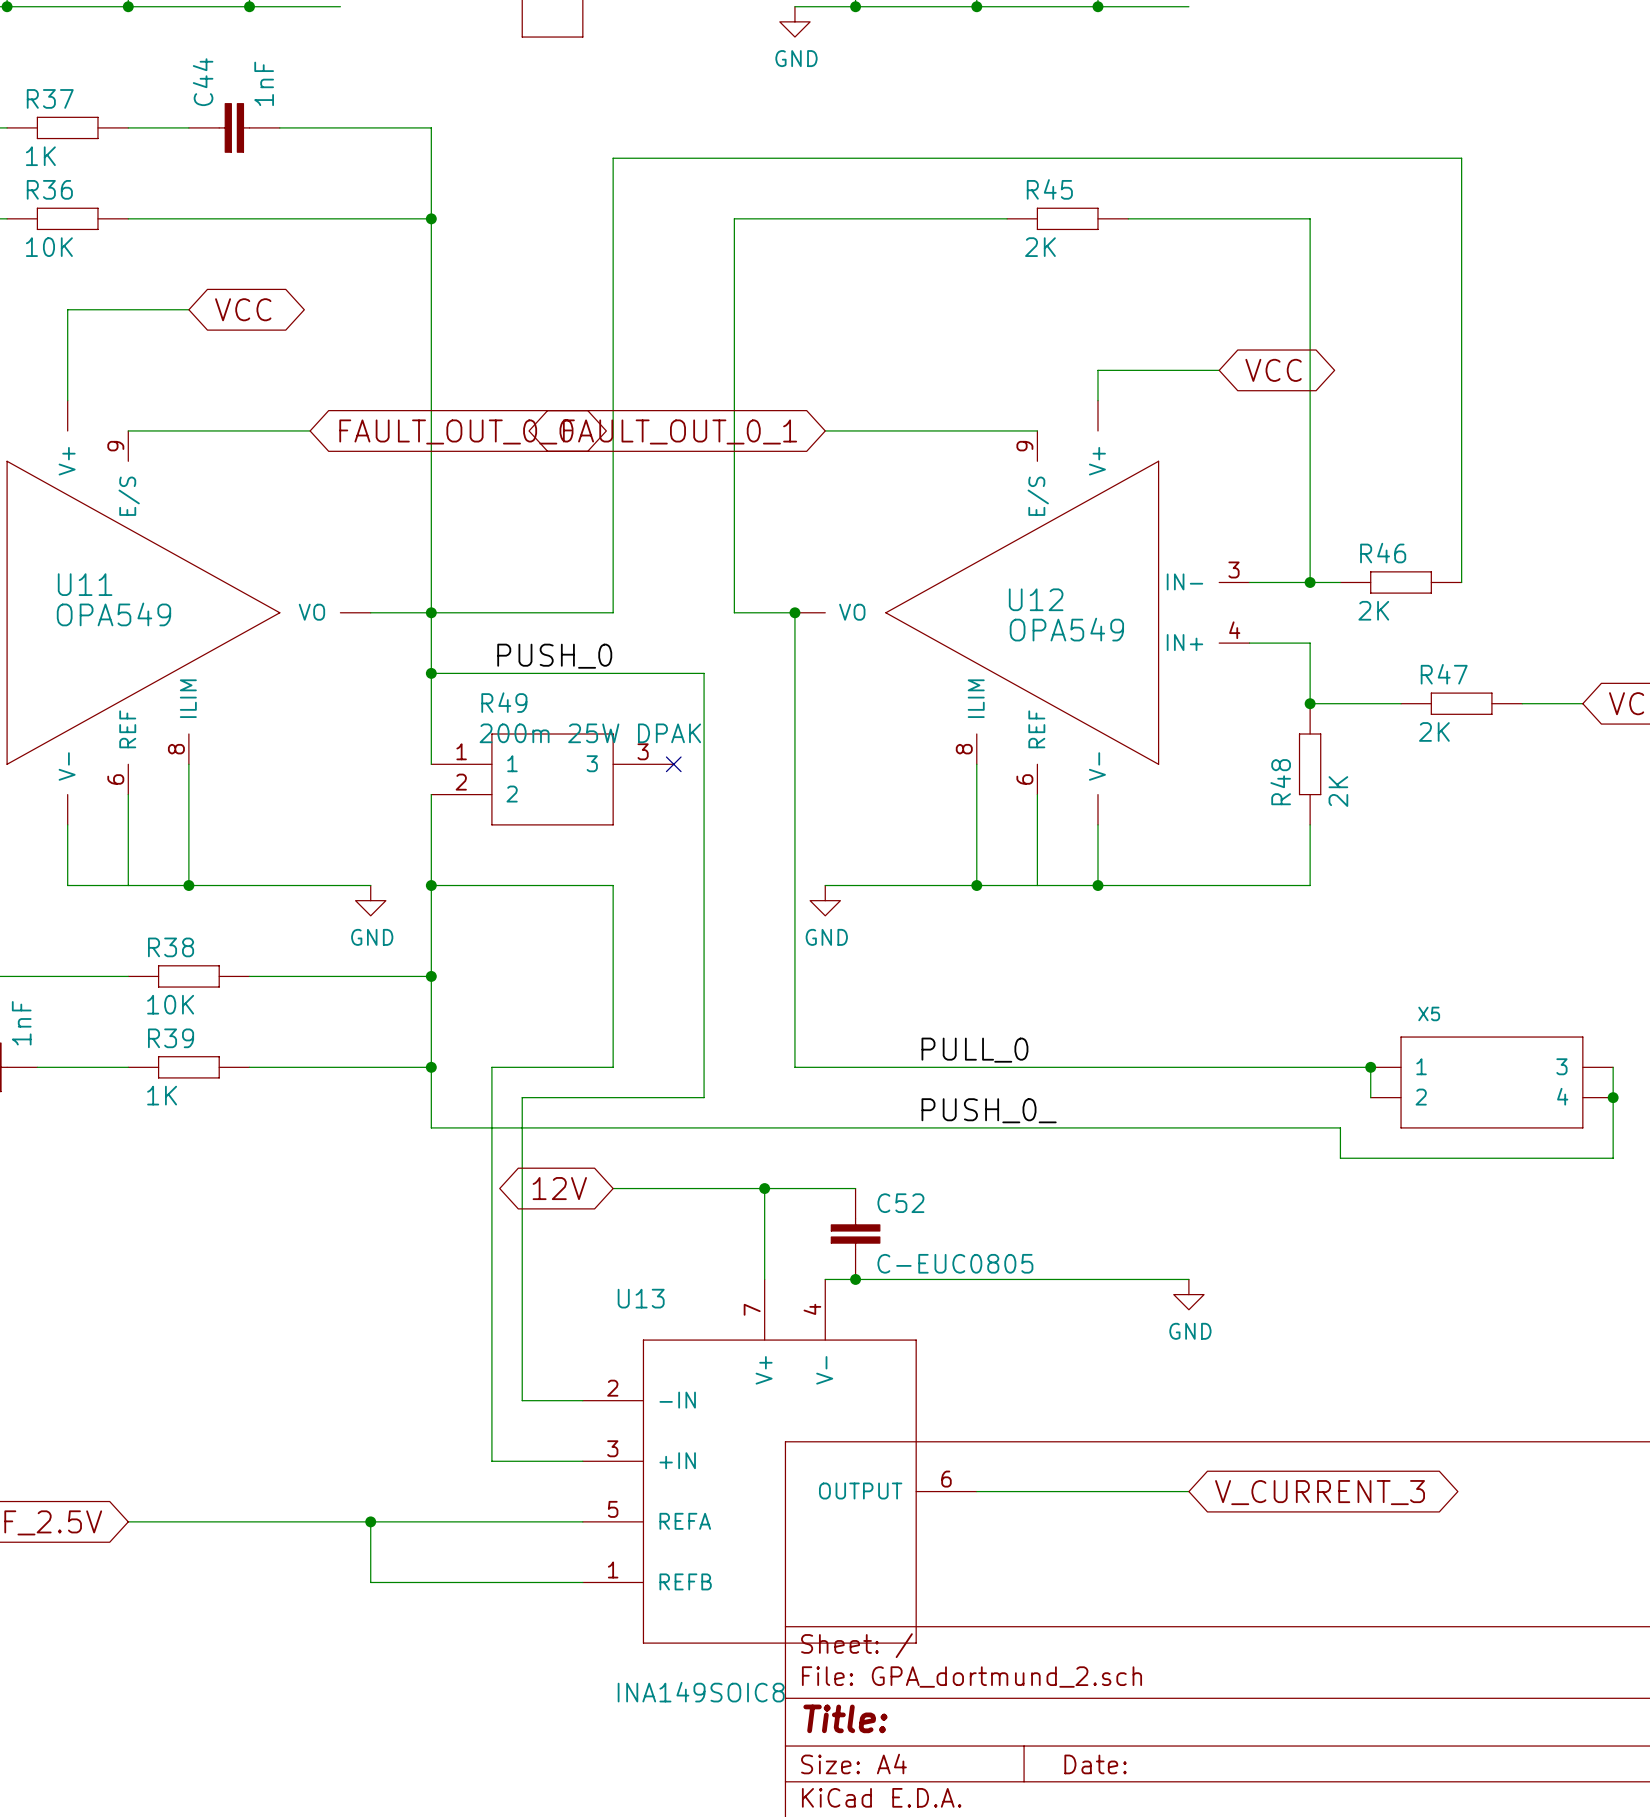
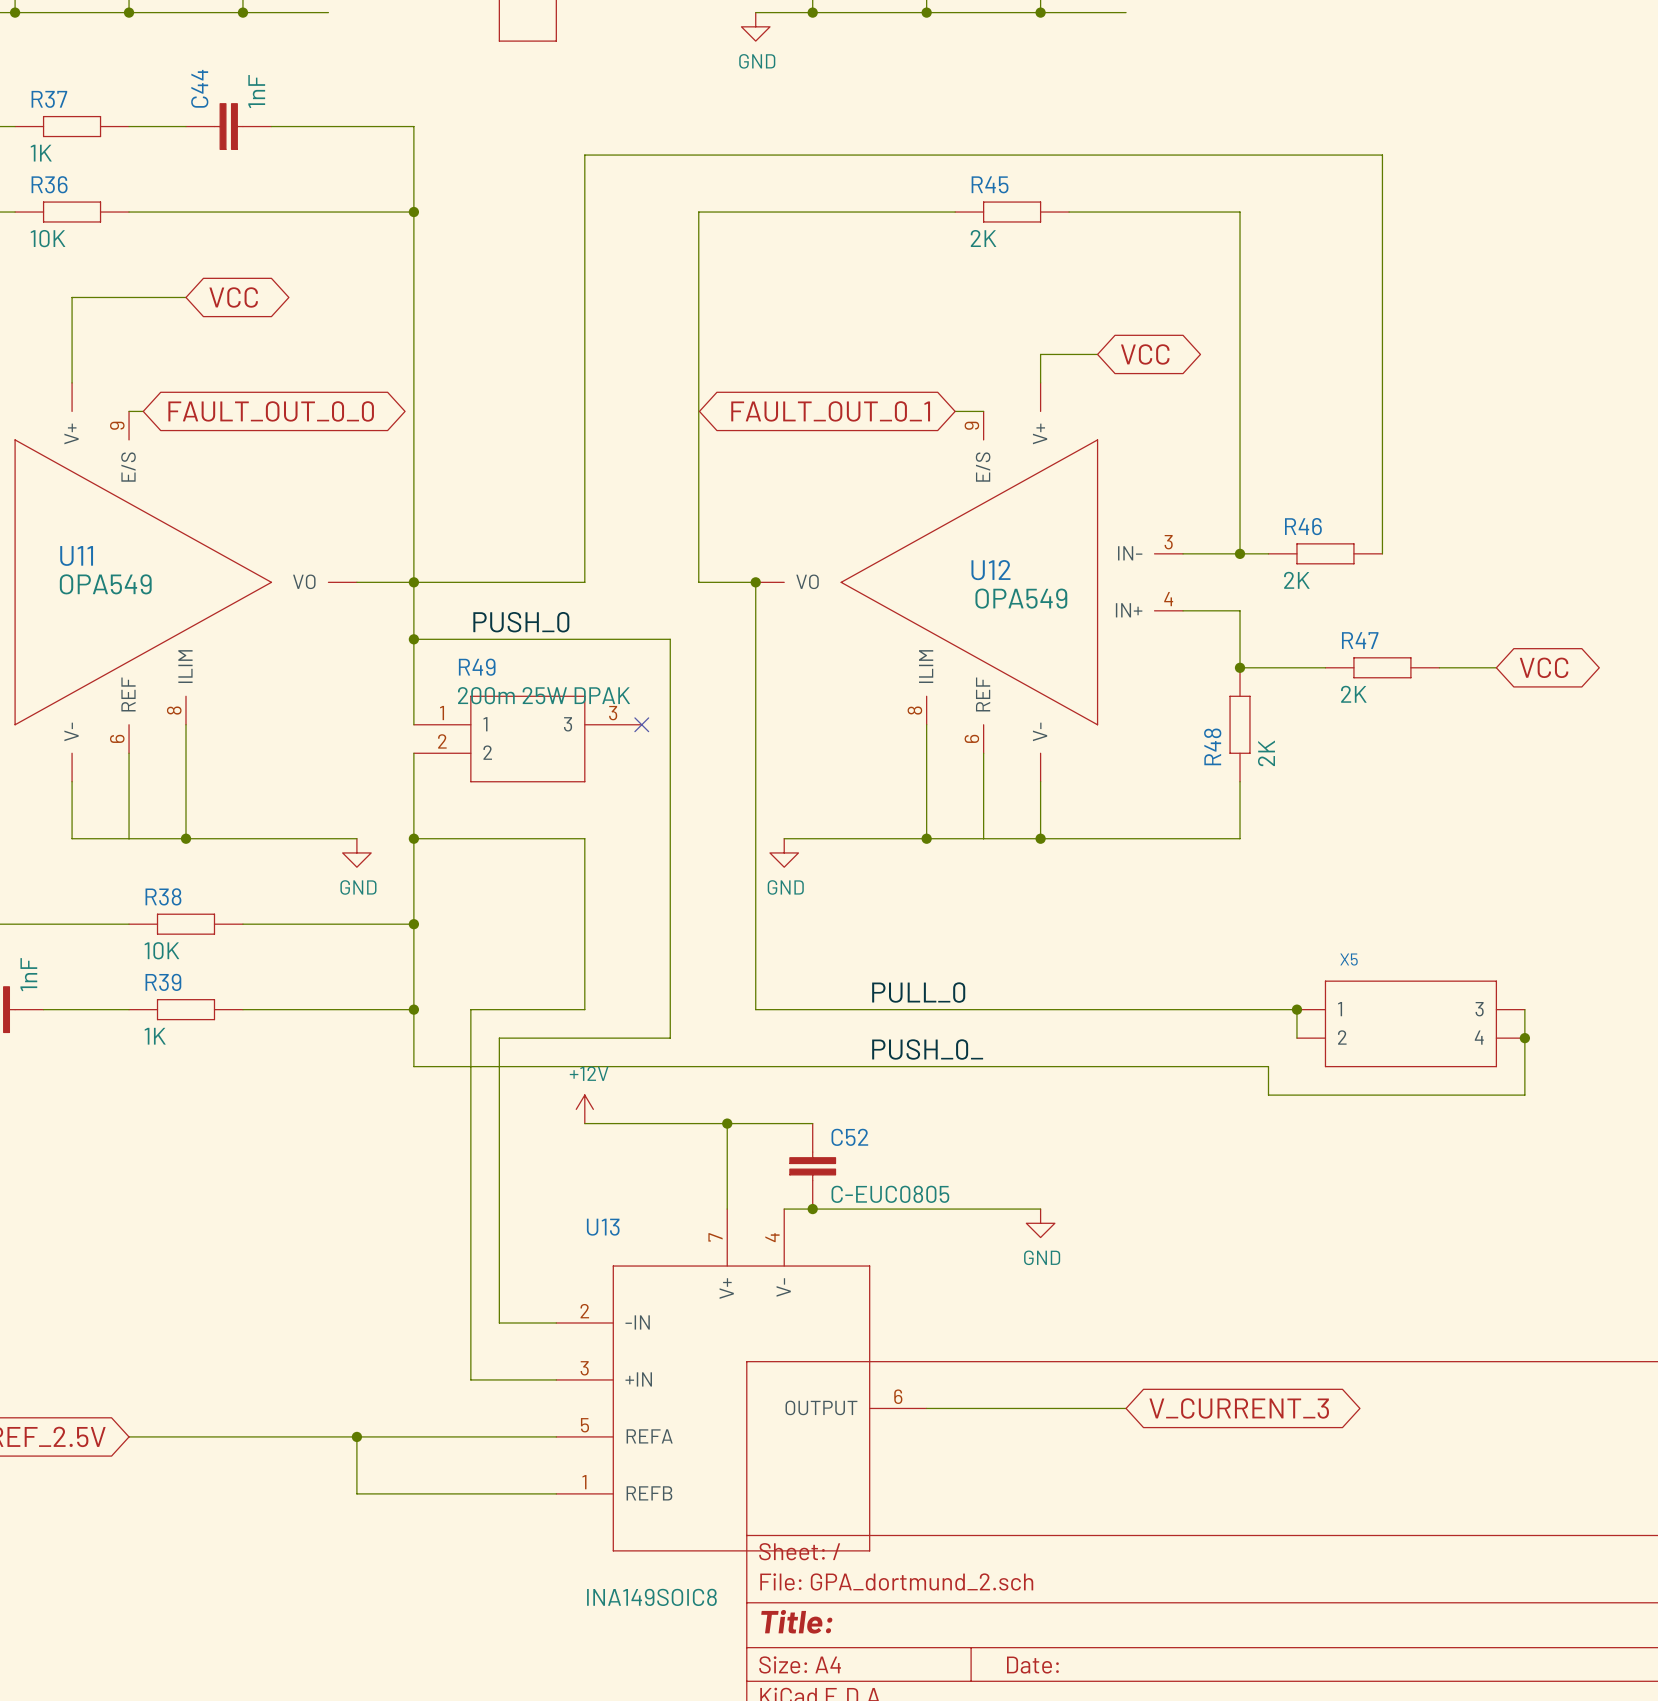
wire: (1158, 370) (1219, 370) -> none
global label position: VCC (1273, 370) -> VCC (1145, 354)
wire: (143, 430) (310, 430) -> none
wire: (825, 430) (1007, 430) -> none
global label position: FAULT_OUT_0_0 (456, 431) -> FAULT_OUT_0_0 (271, 411)
global label position: FAULT_OUT_0_1 (680, 431) -> FAULT_OUT_0_1 (830, 411)
power symbol: none -> +12V (584, 1109)
global label: 12V (559, 1188) -> none
wire: (1097, 1279) (1188, 1279) -> none
power symbol position: GND (1188, 1294) -> GND (1040, 1223)

